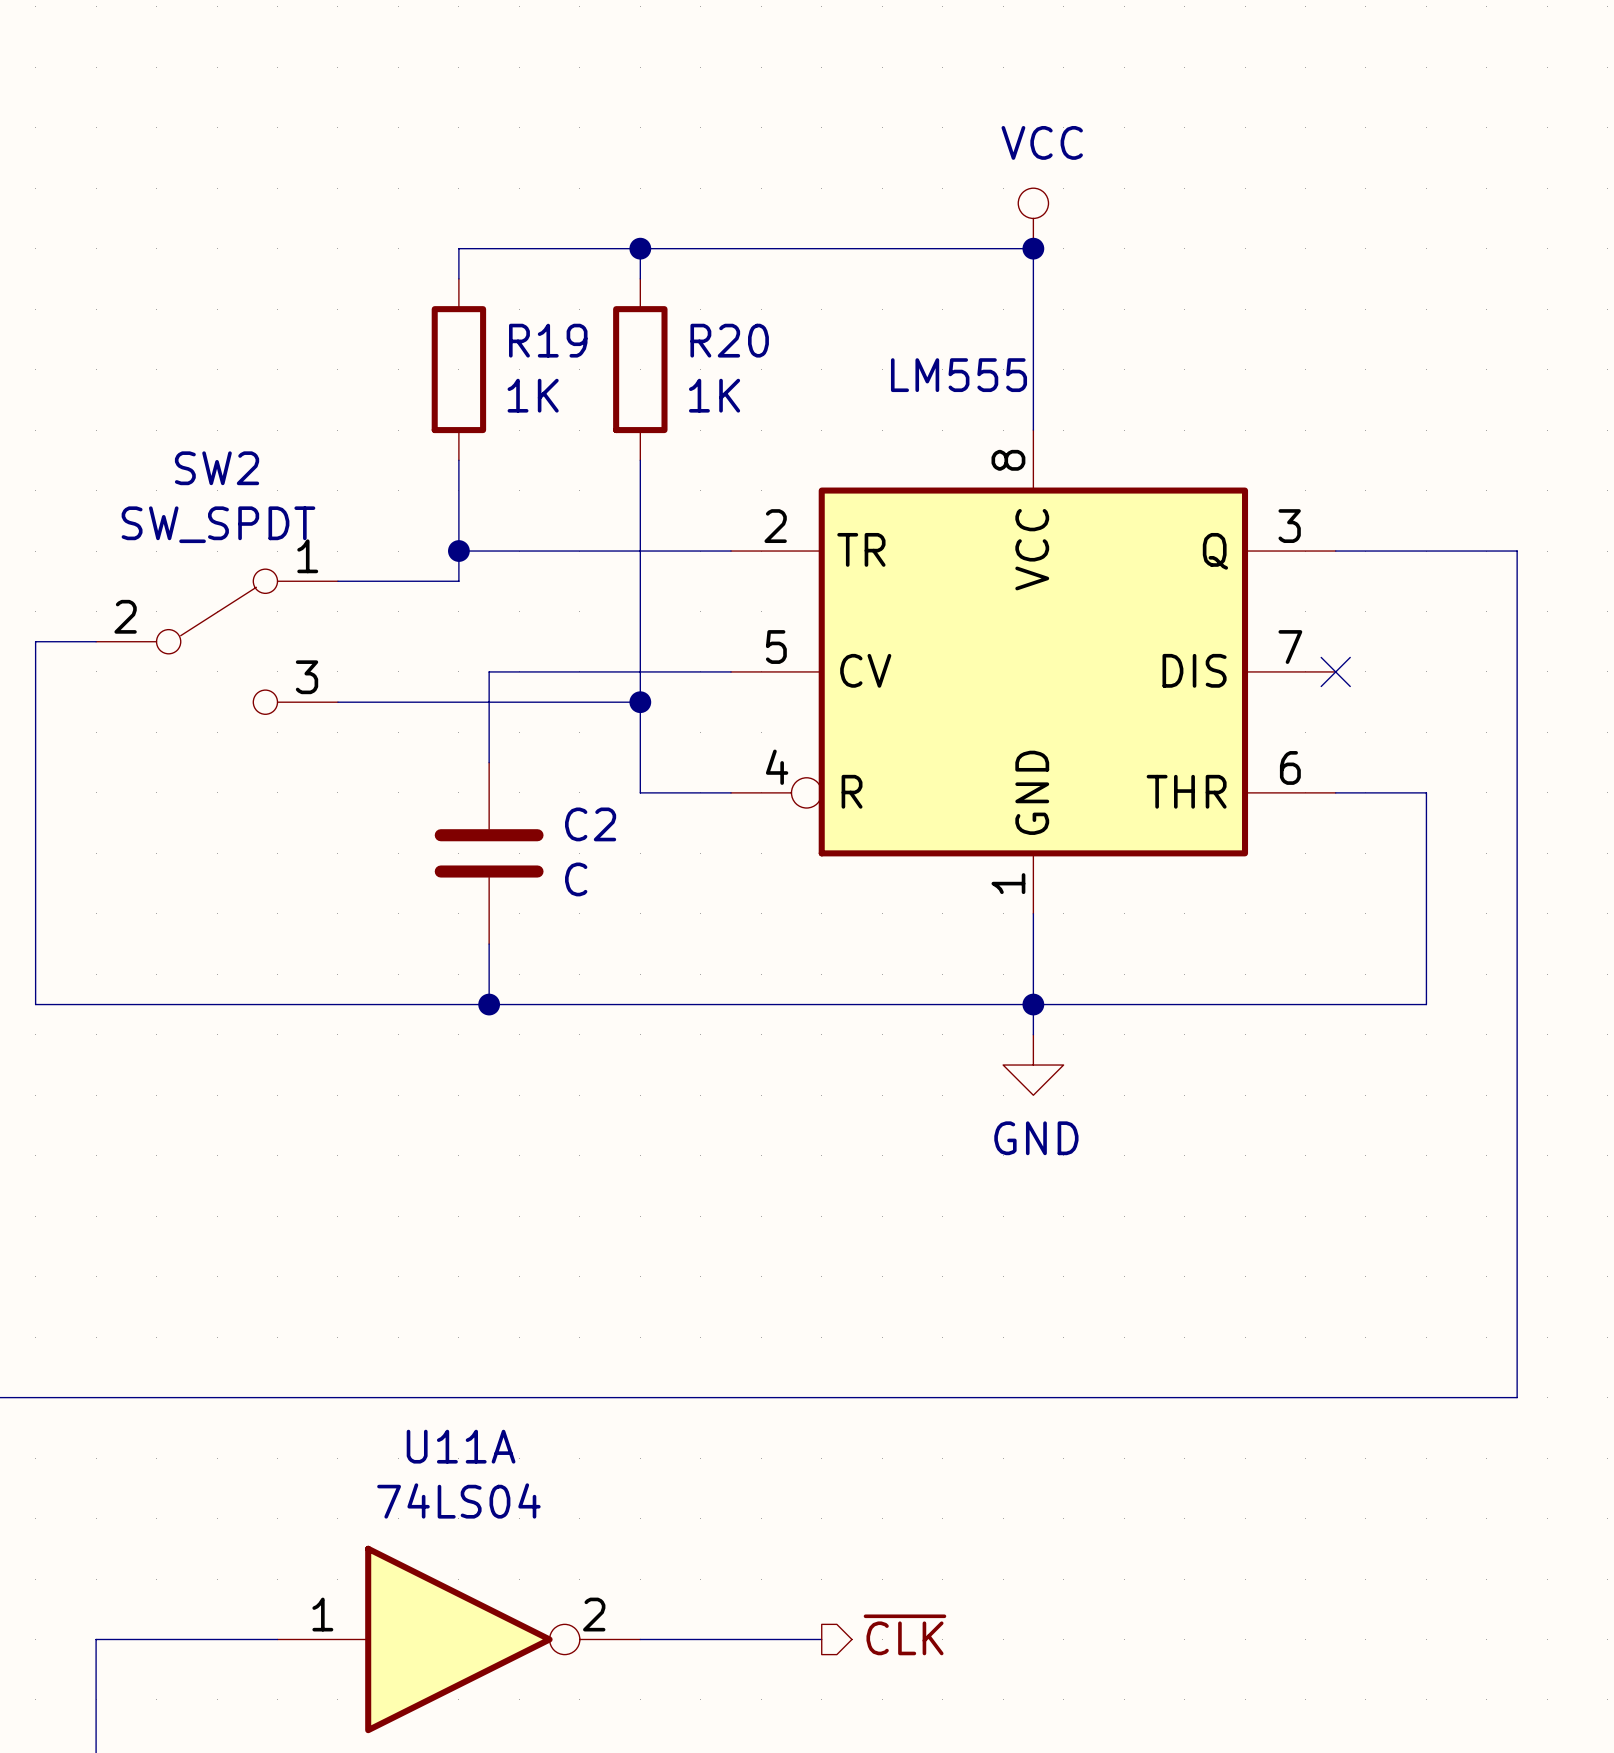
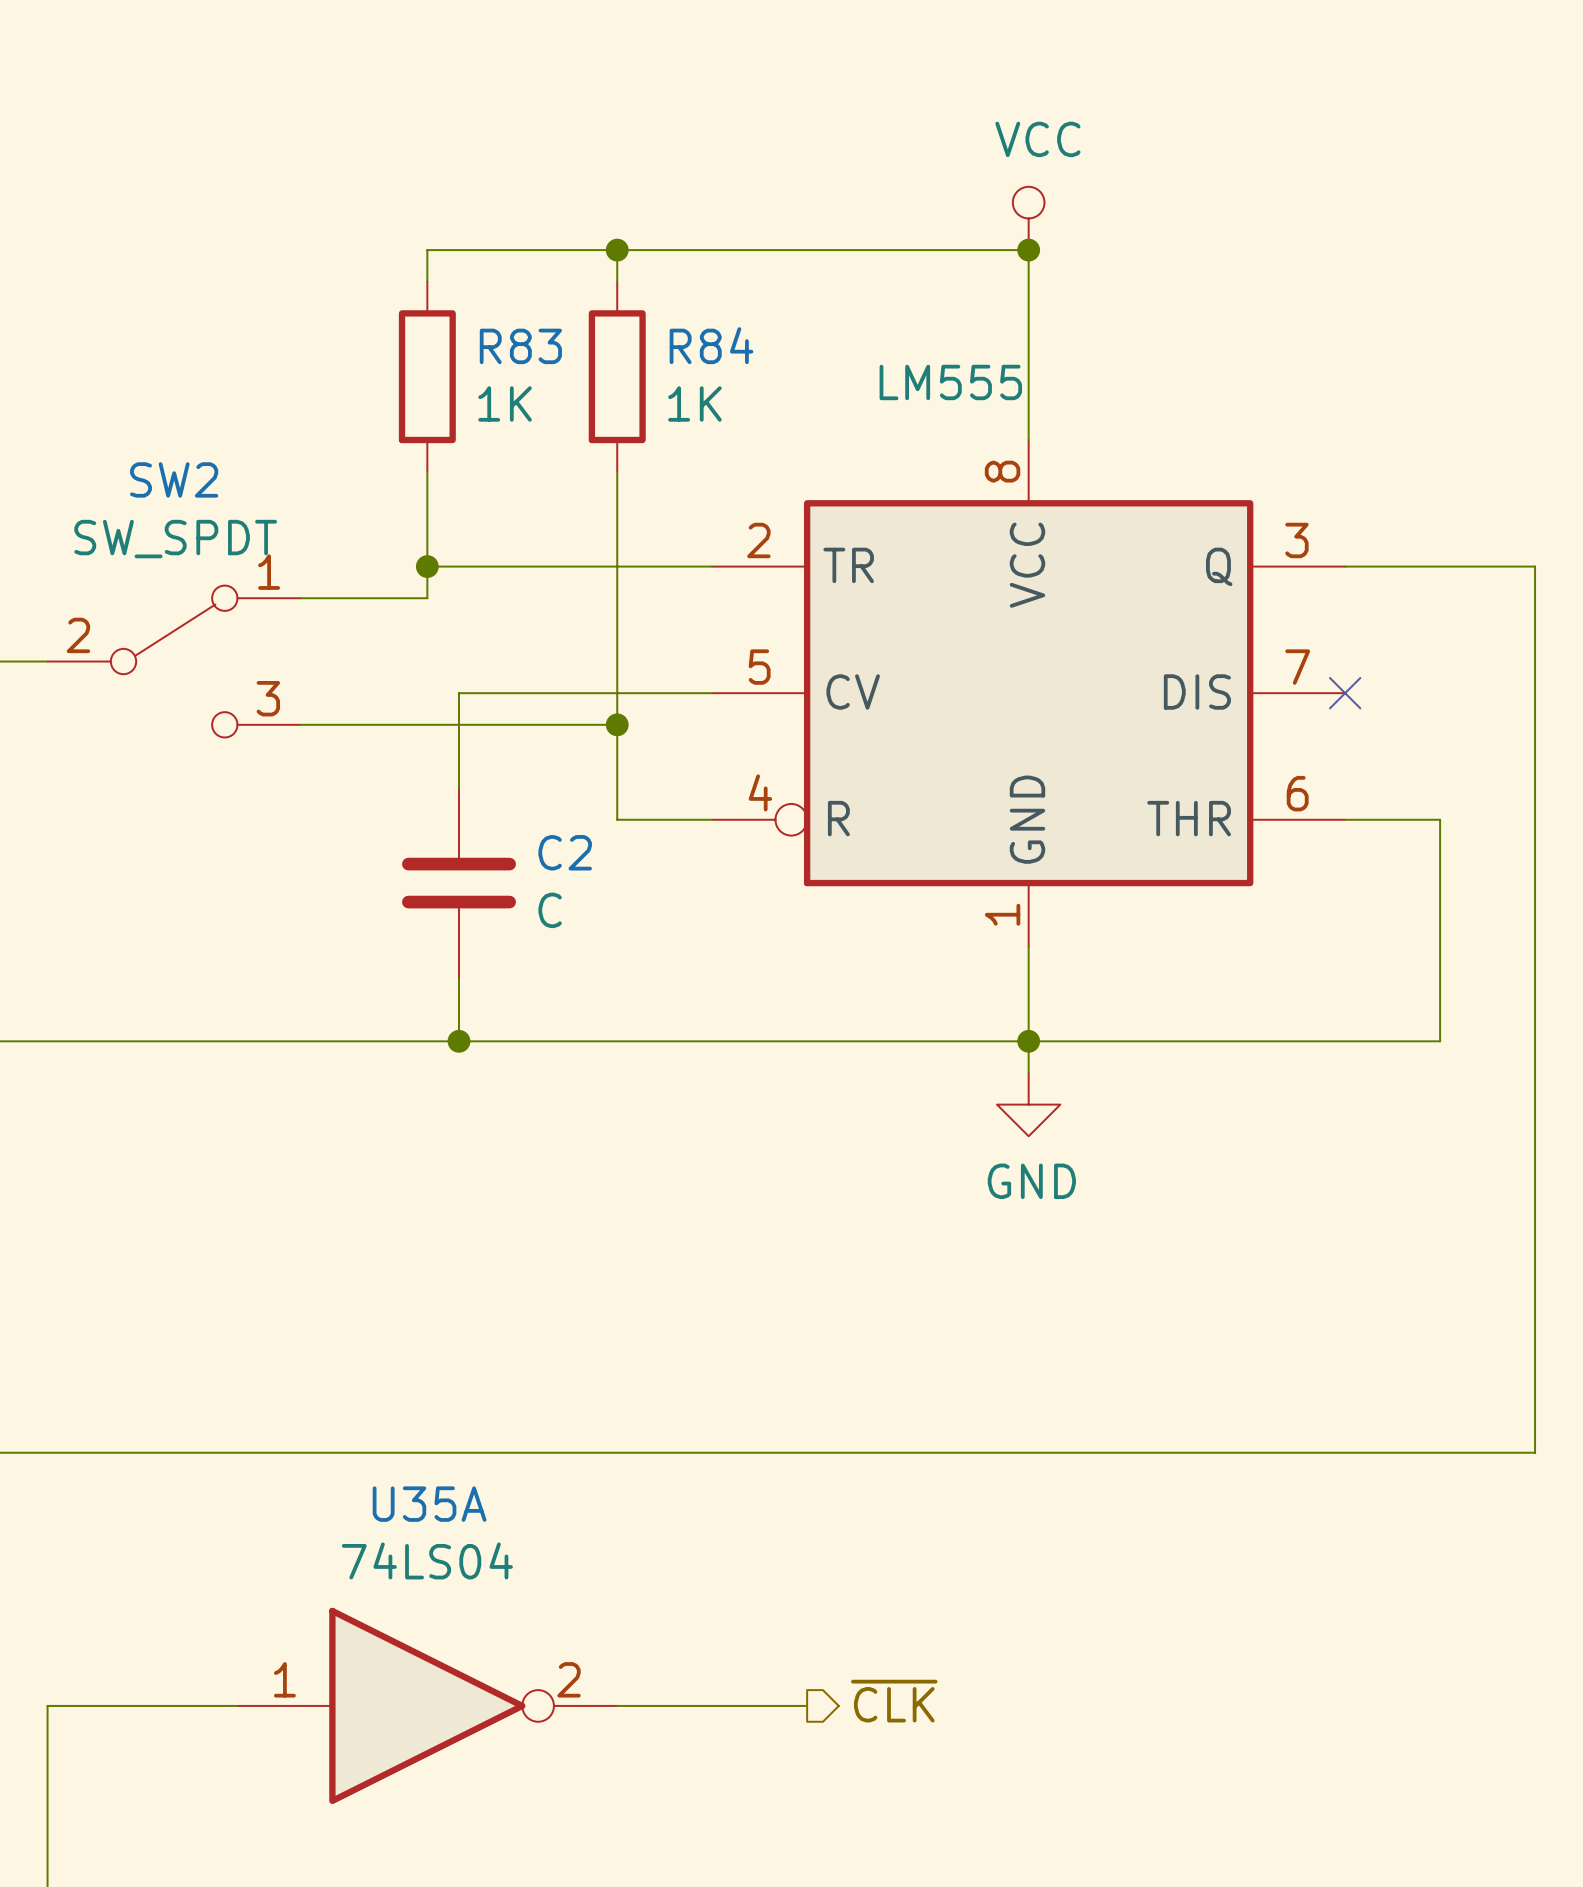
R19 name: R19 (548, 340) -> R83 (520, 346)
R20 name: R20 (729, 340) -> R84 (711, 345)
U11A name: U11A (461, 1446) -> U35A (429, 1504)

